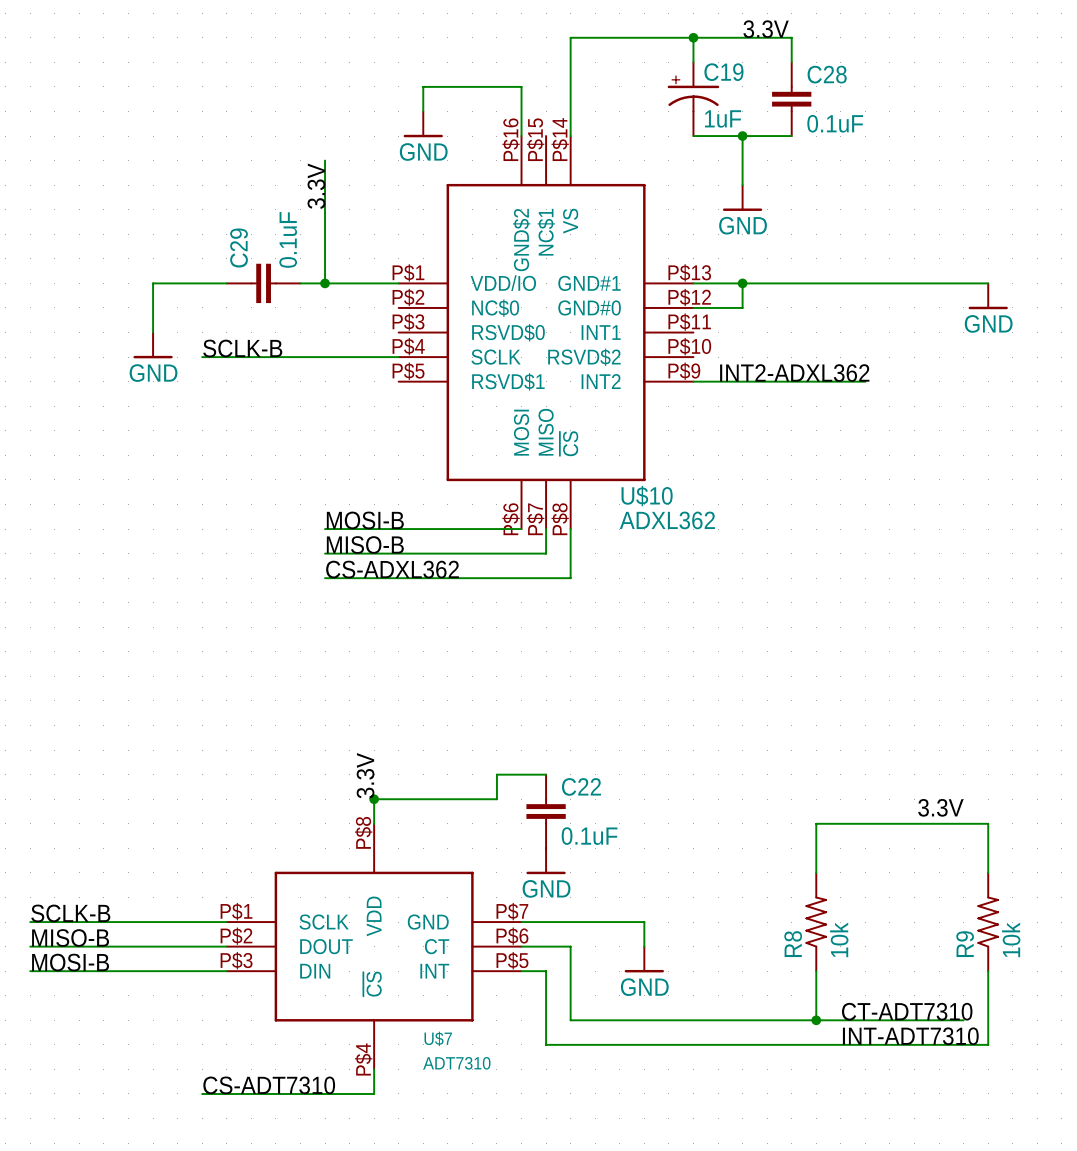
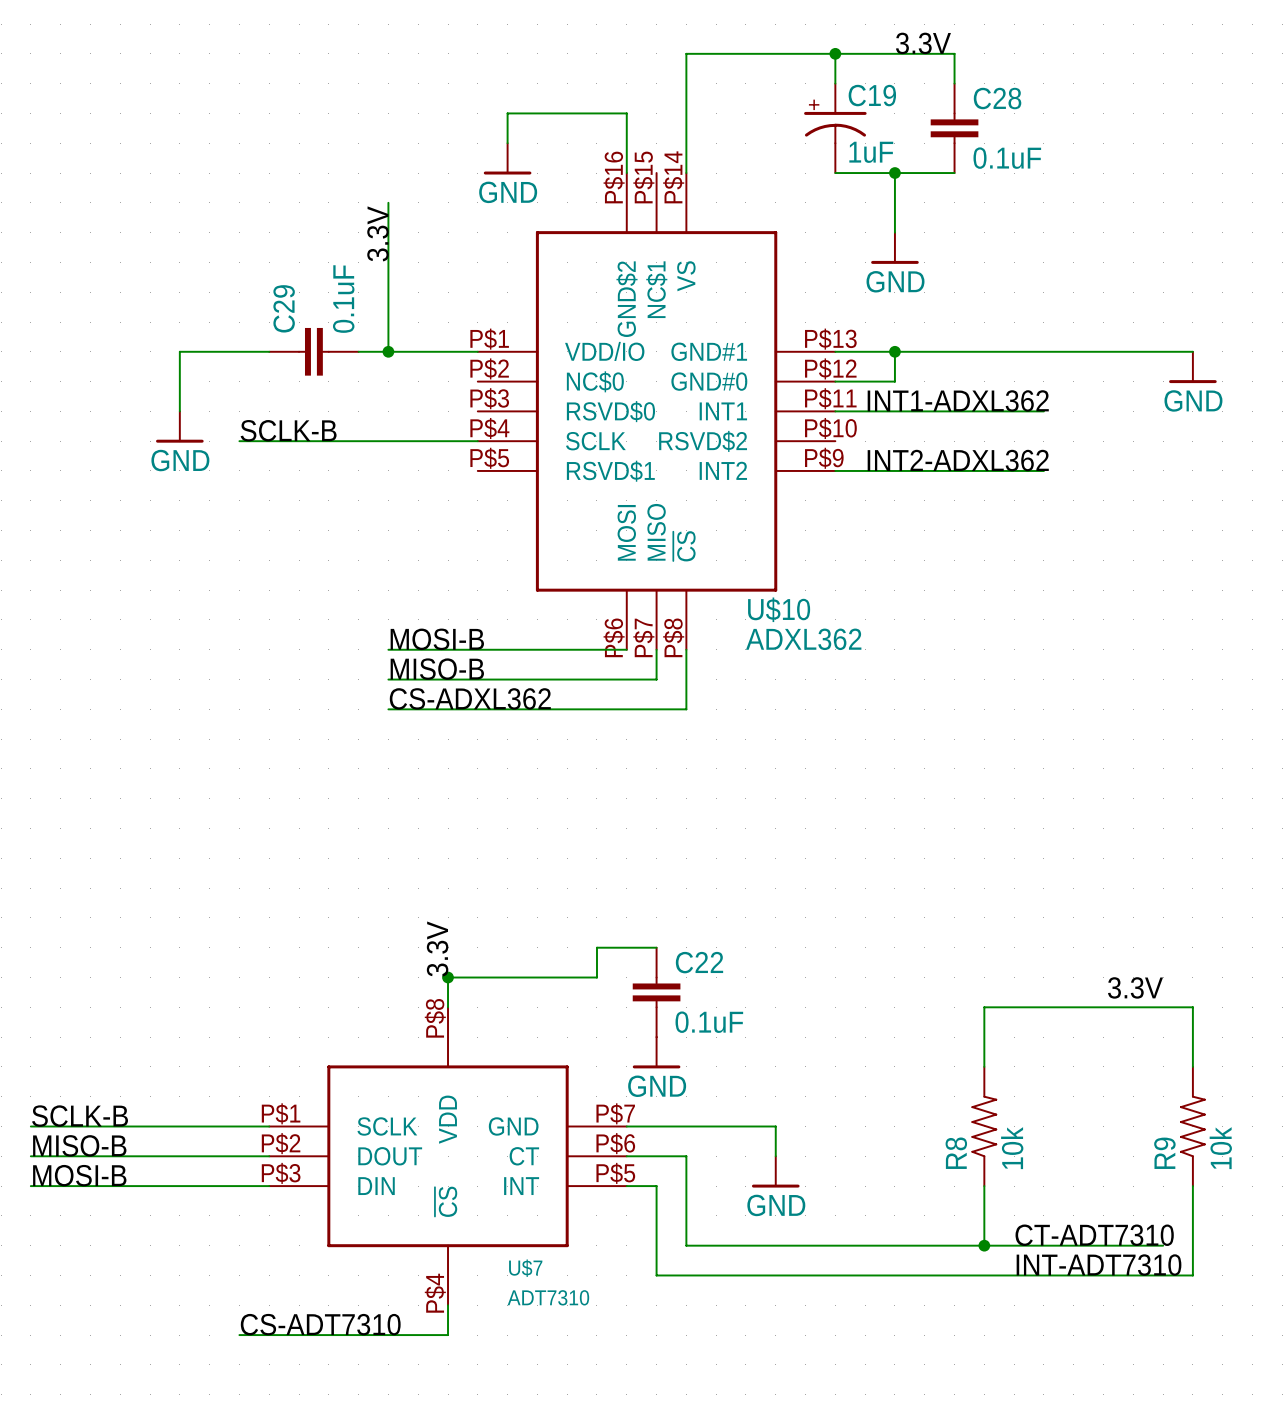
label: none -> INT1-ADXL362 (958, 400)
wire: none -> (835, 411) (1043, 411)

